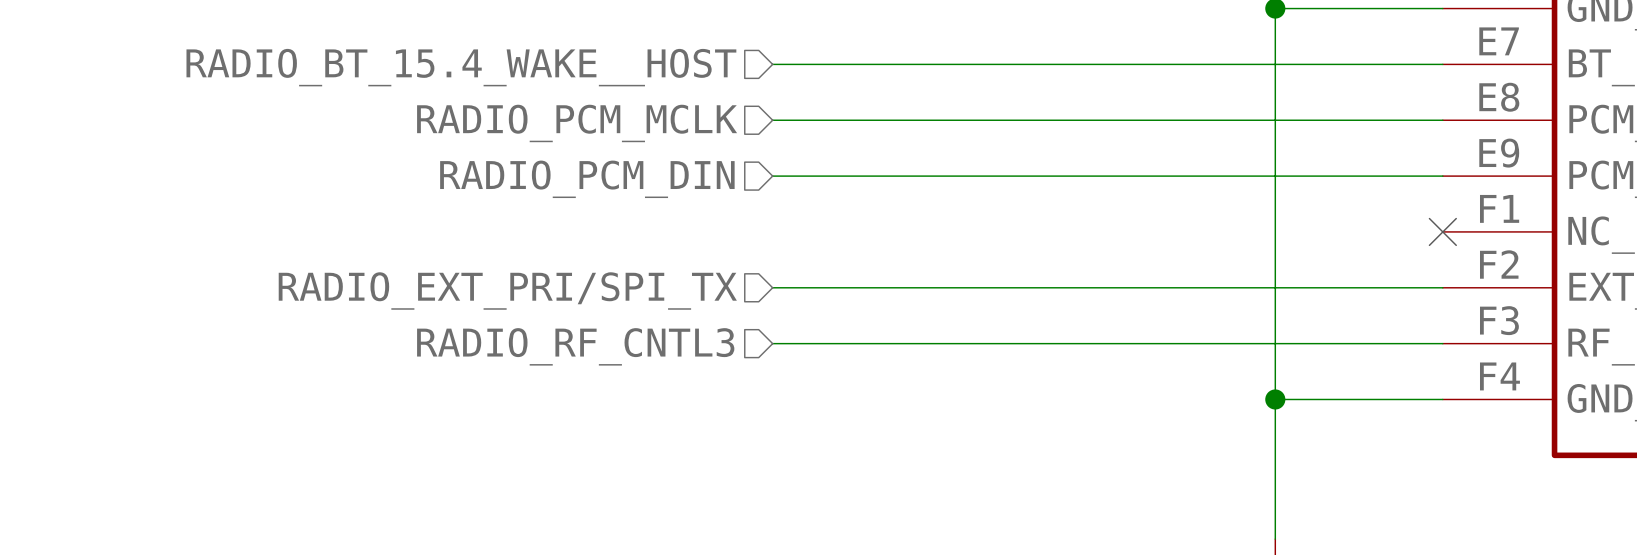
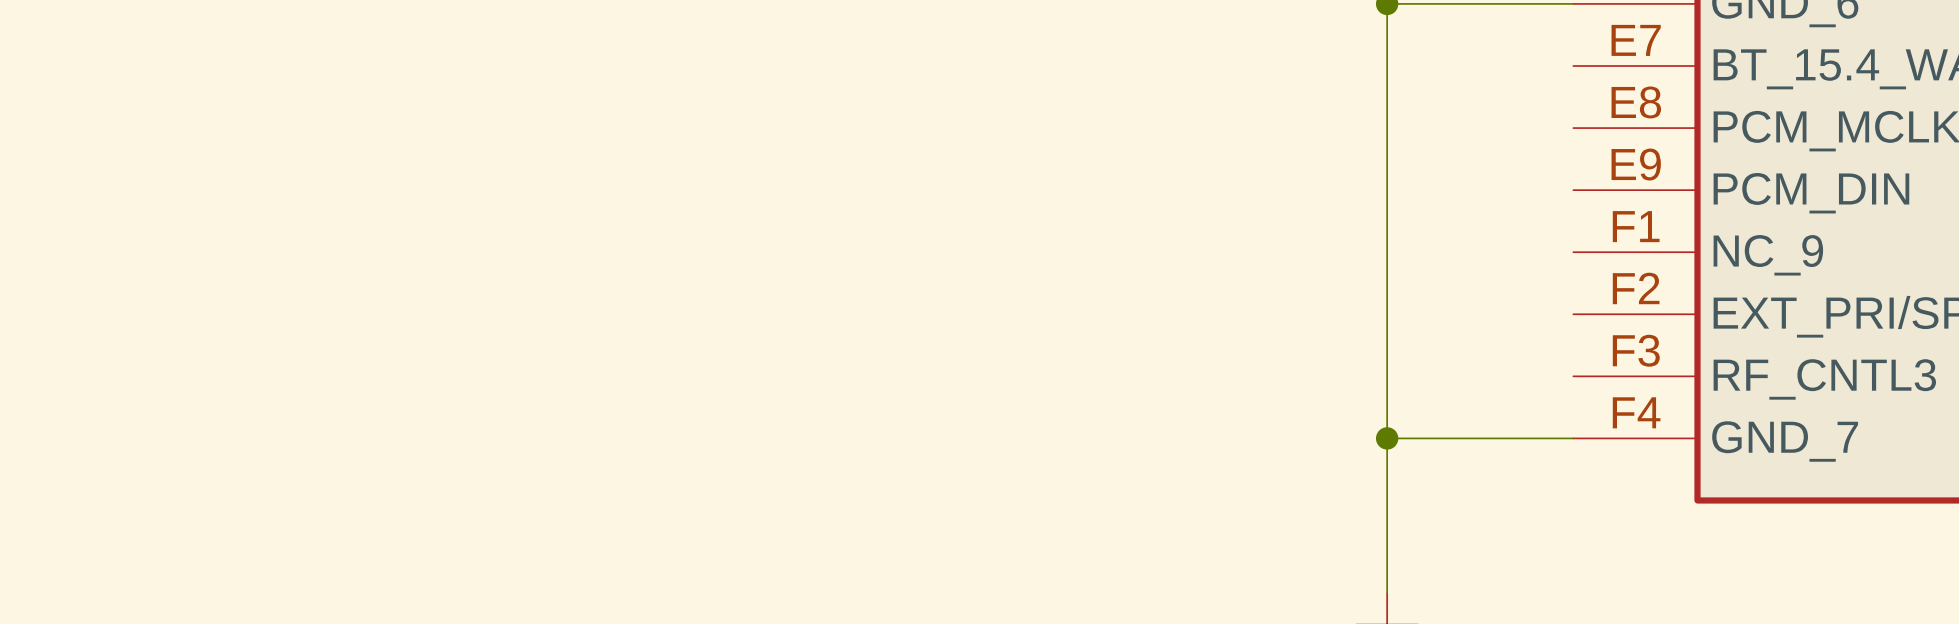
wire: (772, 64) (1442, 64) -> none
hierarchical label: RADIO_BT_15.4_WAKE__HOST (461, 67) -> none
wire: (772, 120) (1442, 120) -> none
hierarchical label: RADIO_PCM_MCLK (577, 123) -> none
wire: (772, 176) (1442, 176) -> none
hierarchical label: RADIO_PCM_DIN (587, 179) -> none
no-connect mark: (1442, 231) -> none
wire: (772, 287) (1442, 287) -> none
hierarchical label: RADIO_EXT_PRI/SPI_TX (507, 291) -> none
wire: (772, 343) (1442, 343) -> none
hierarchical label: RADIO_RF_CNTL3 (575, 346) -> none

